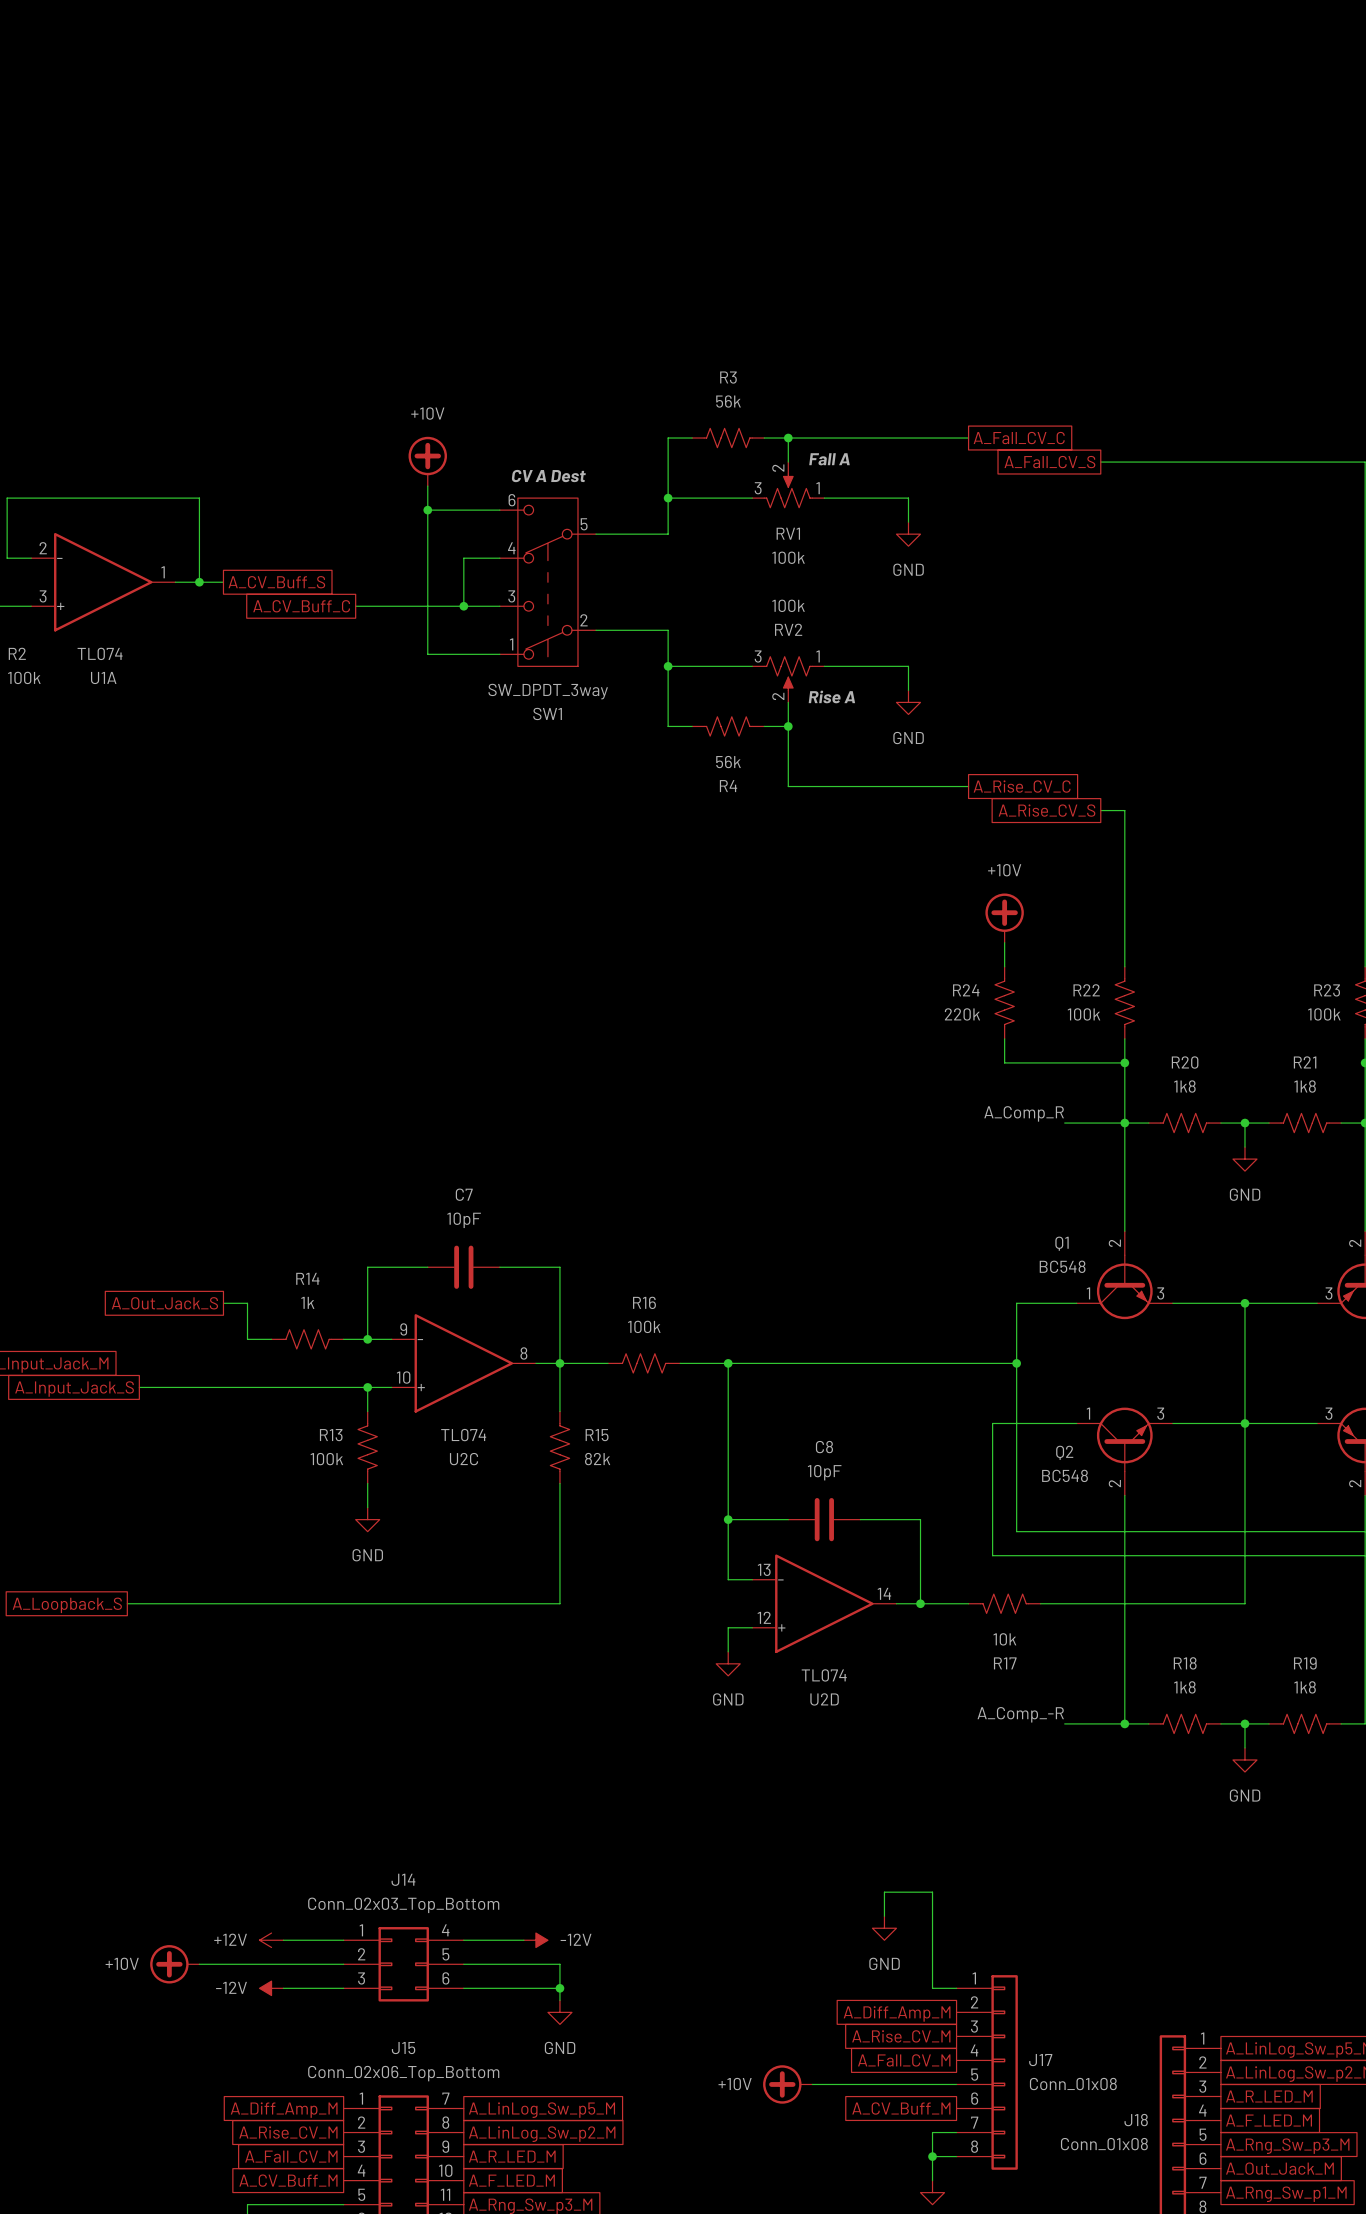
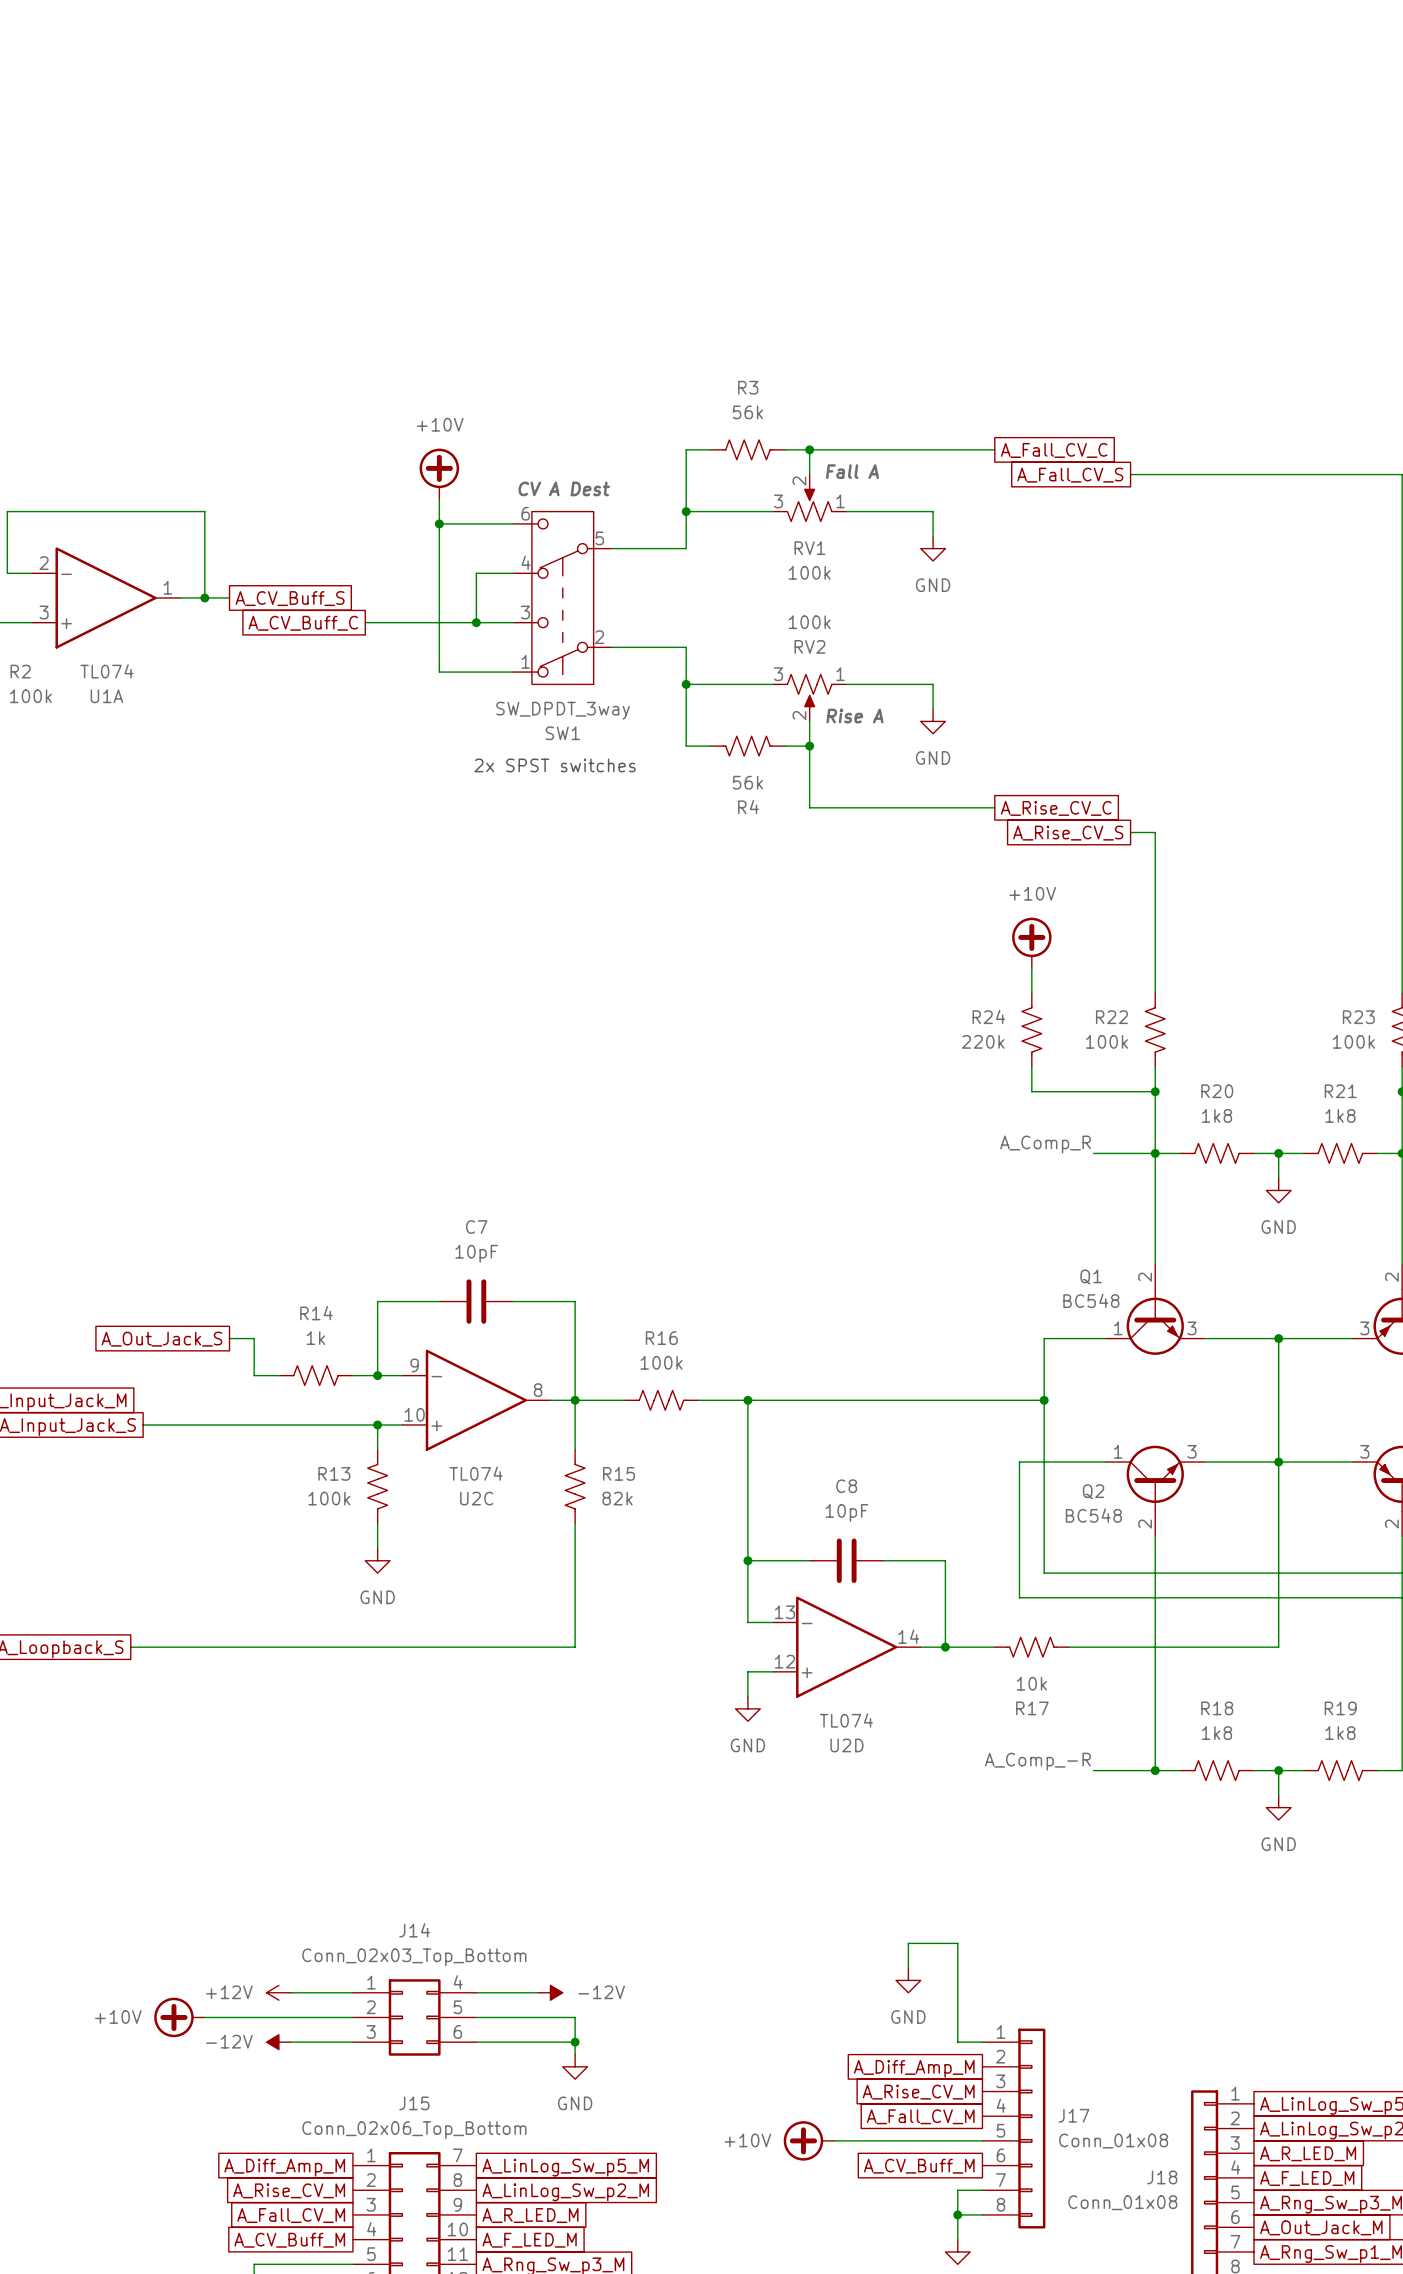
text: none -> 2x SPST switches (555, 765)

